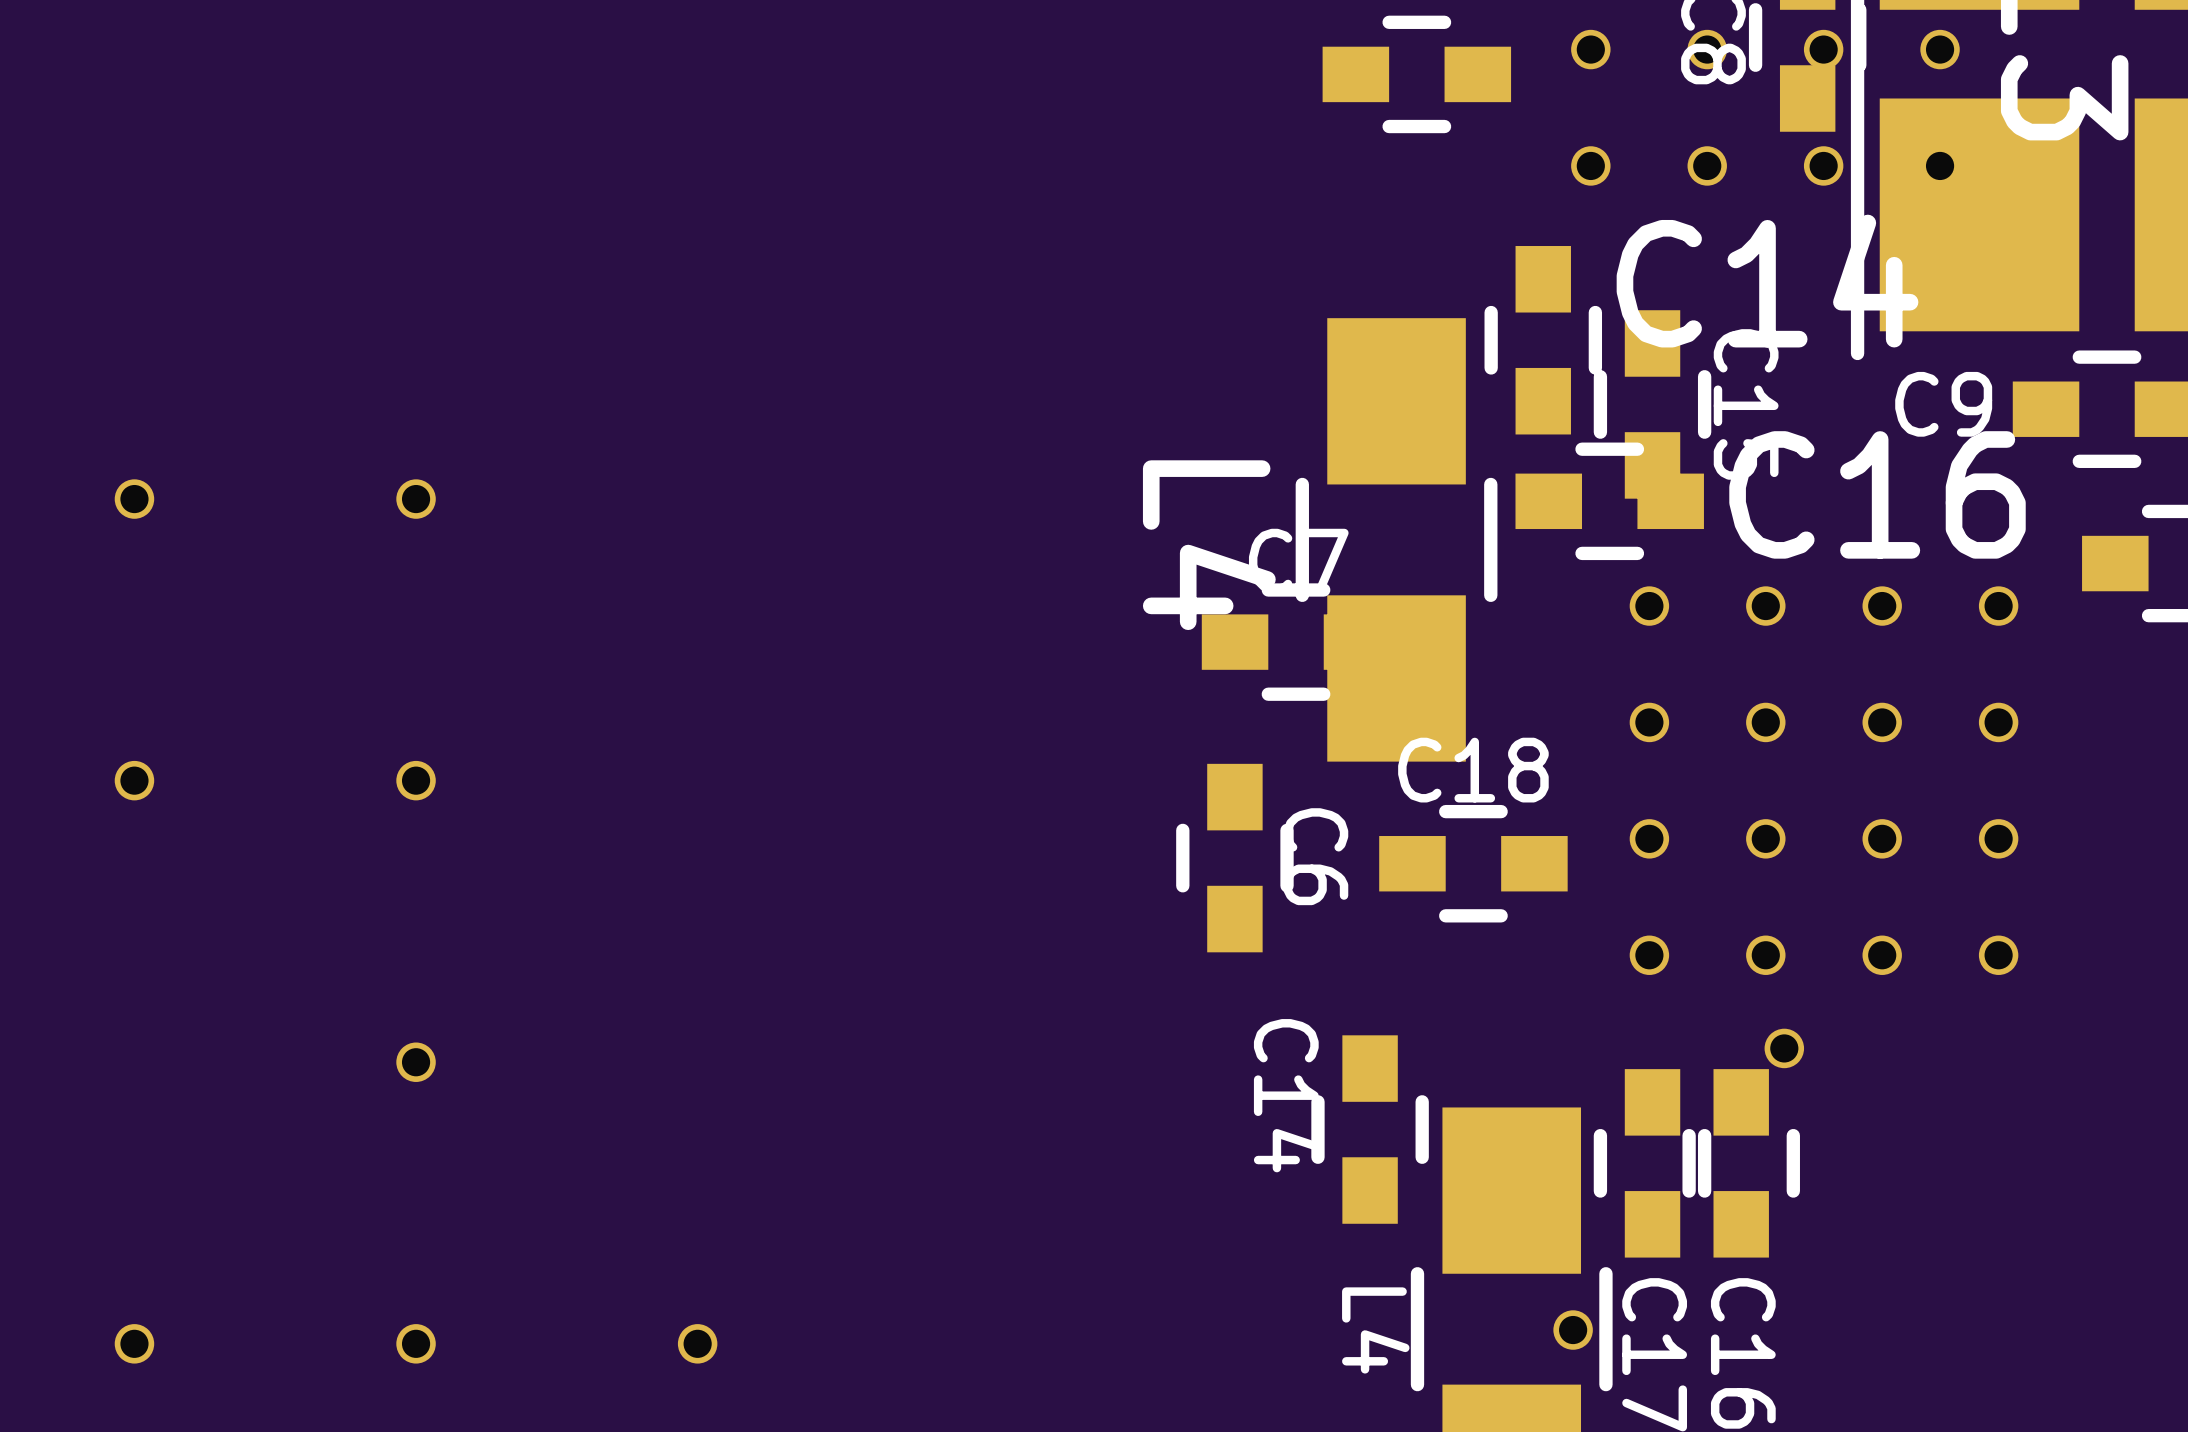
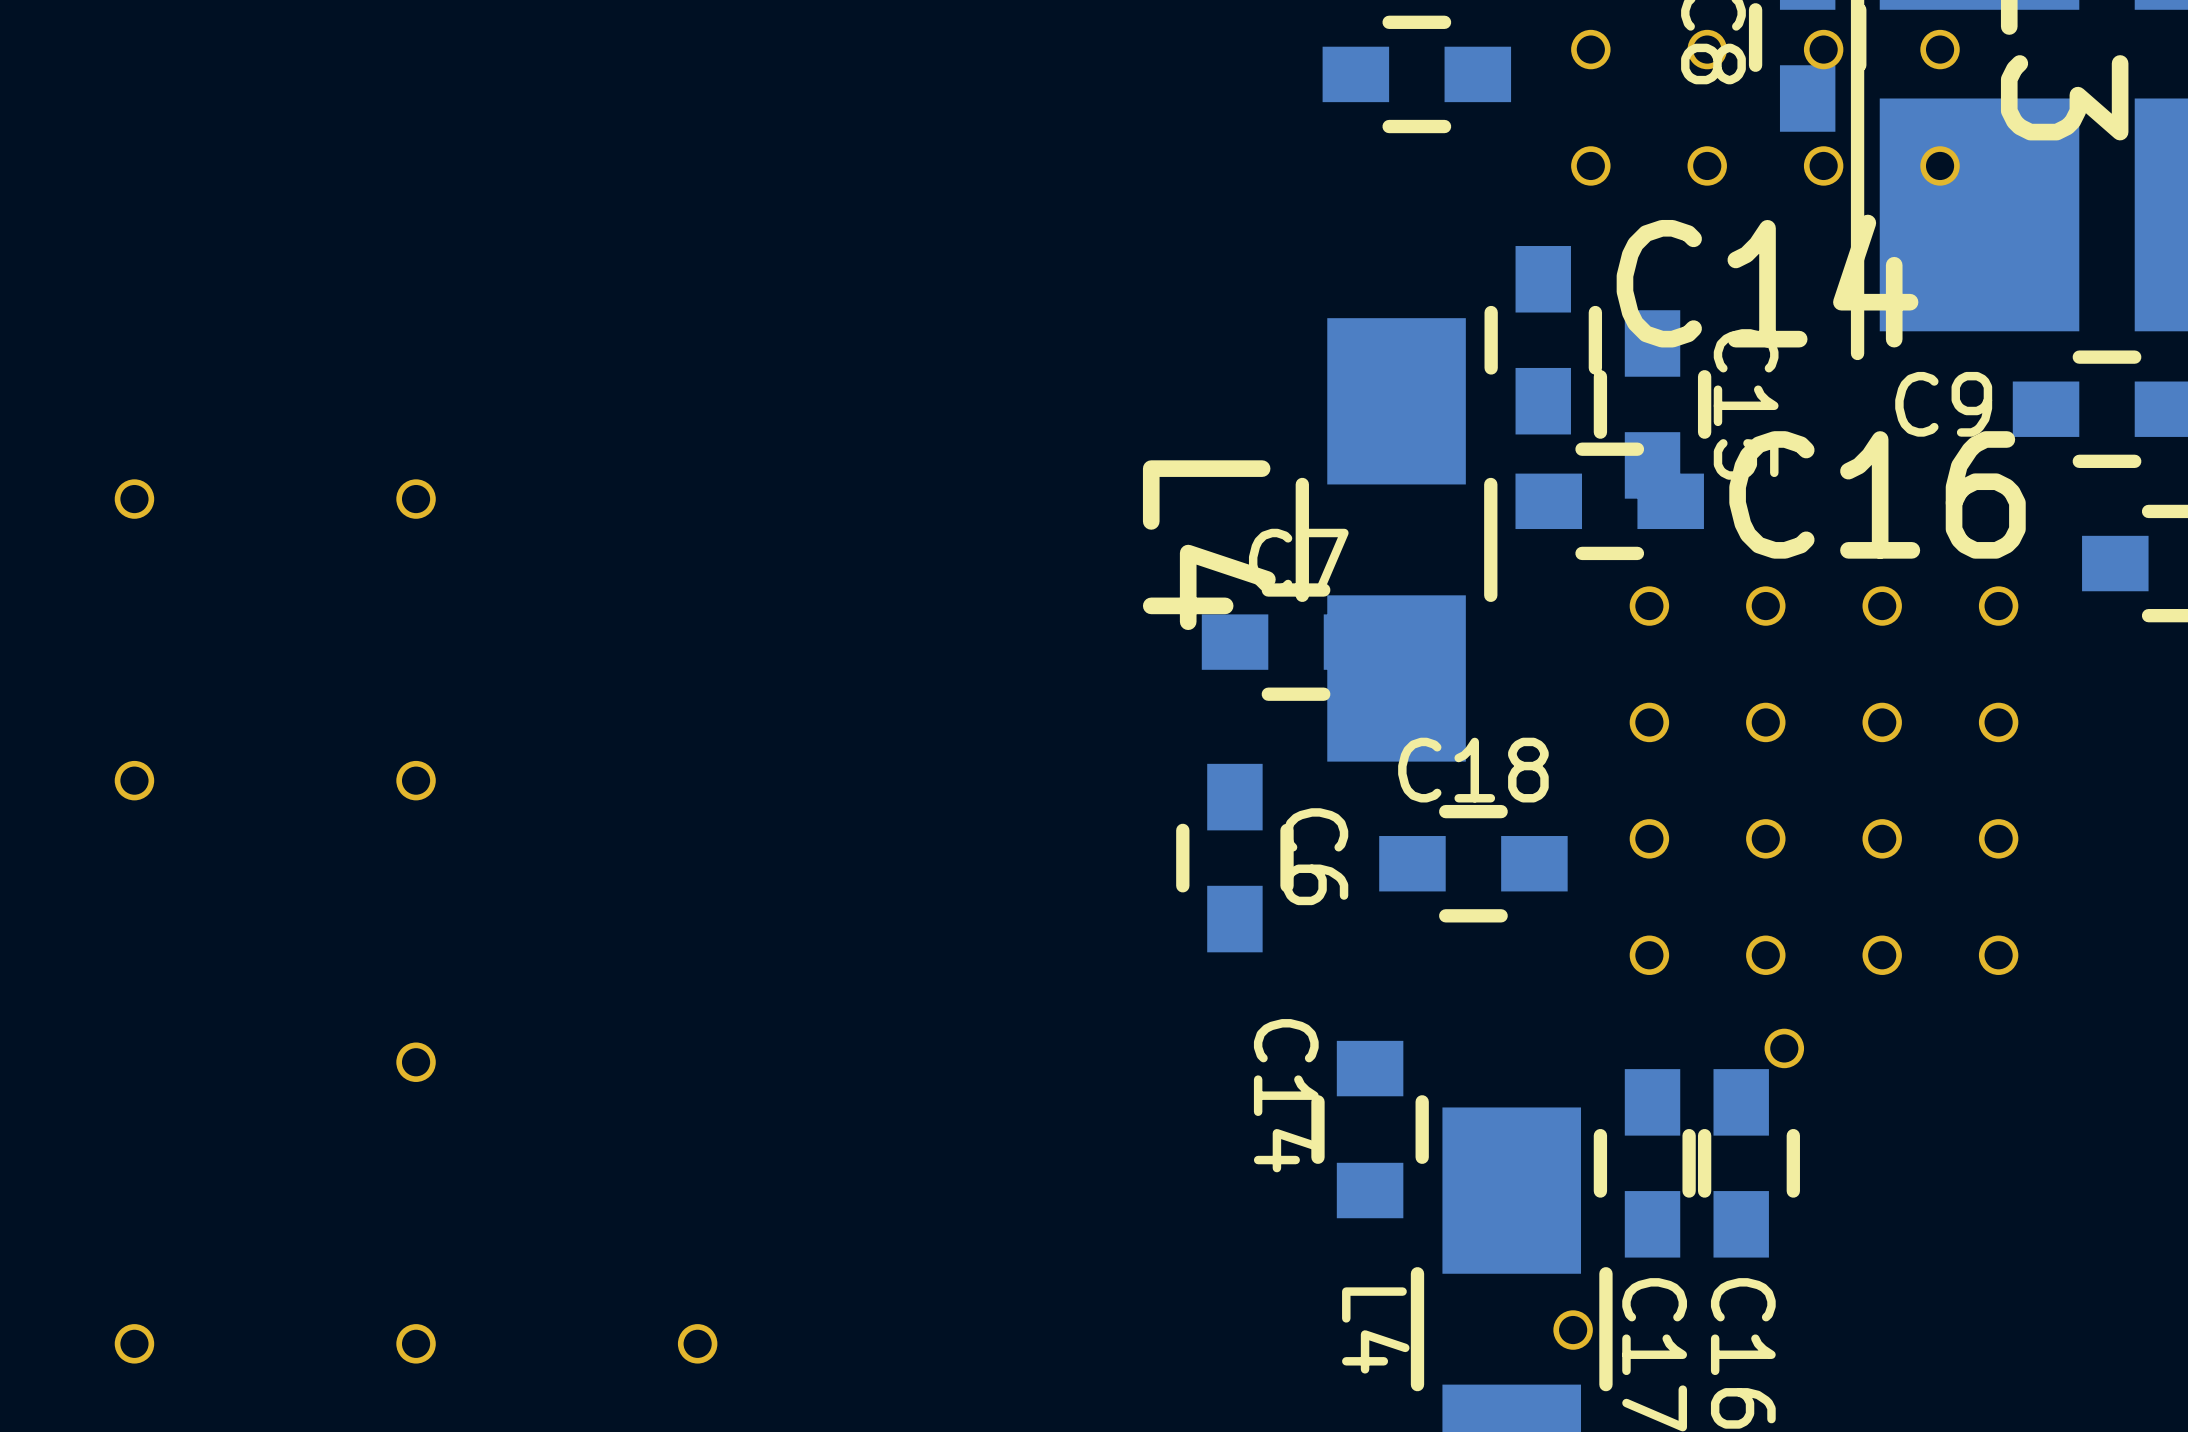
C14 footprint: [1311, 1035, 1429, 1224] -> [1311, 1040, 1429, 1219]

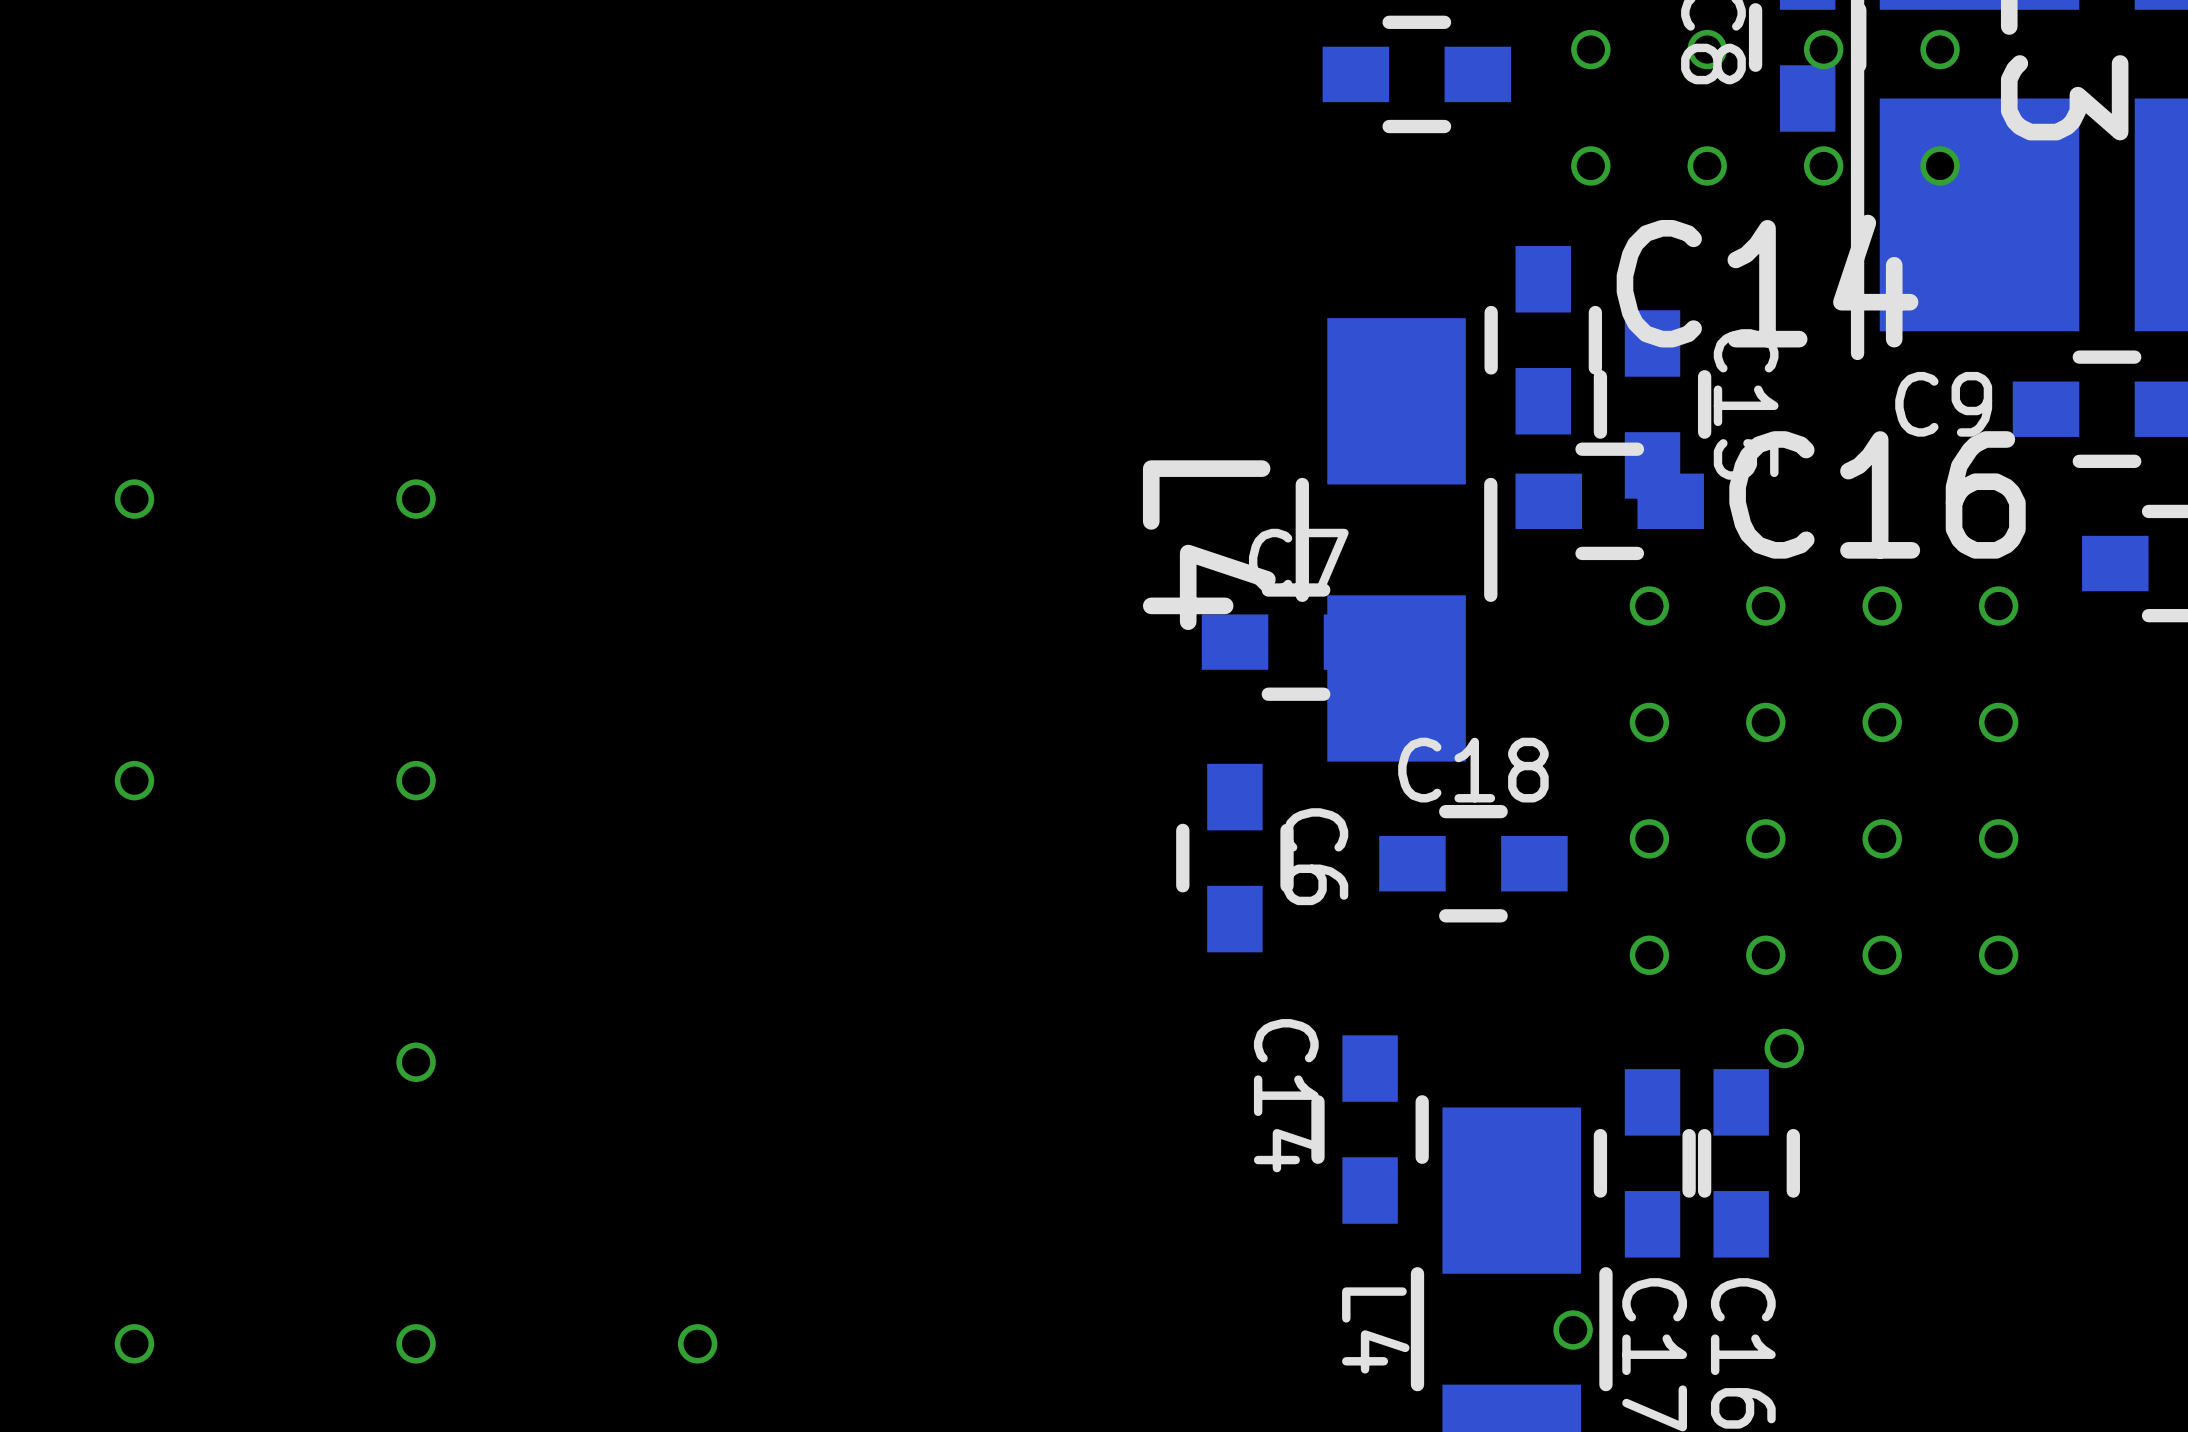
C14 footprint: [1311, 1040, 1429, 1219] -> [1311, 1035, 1429, 1224]

